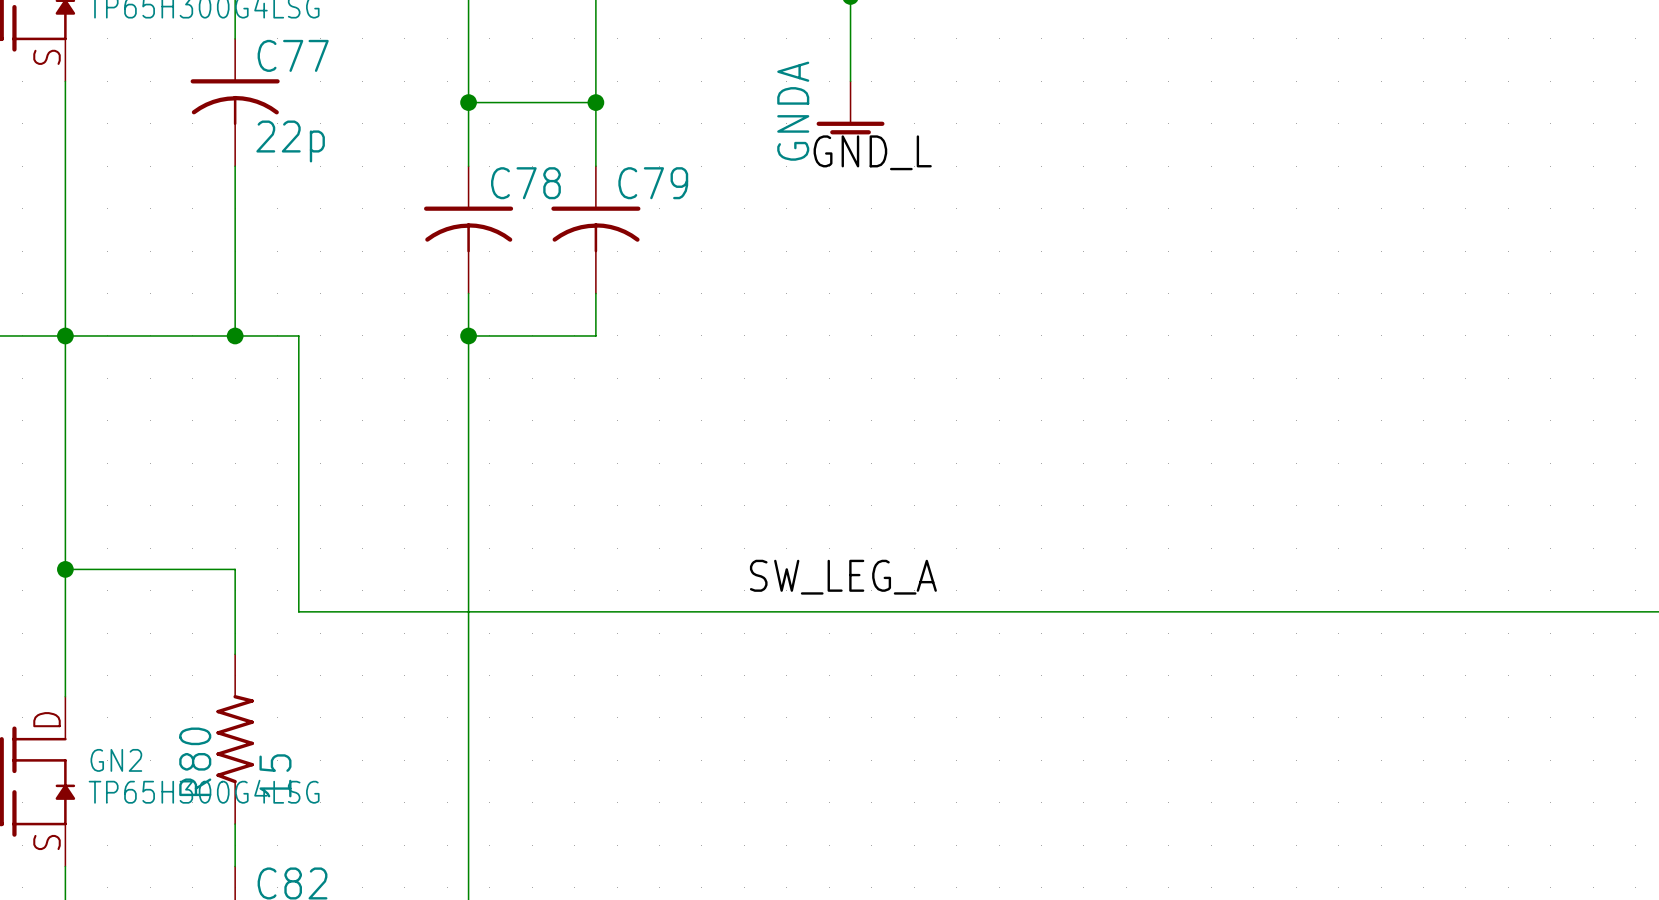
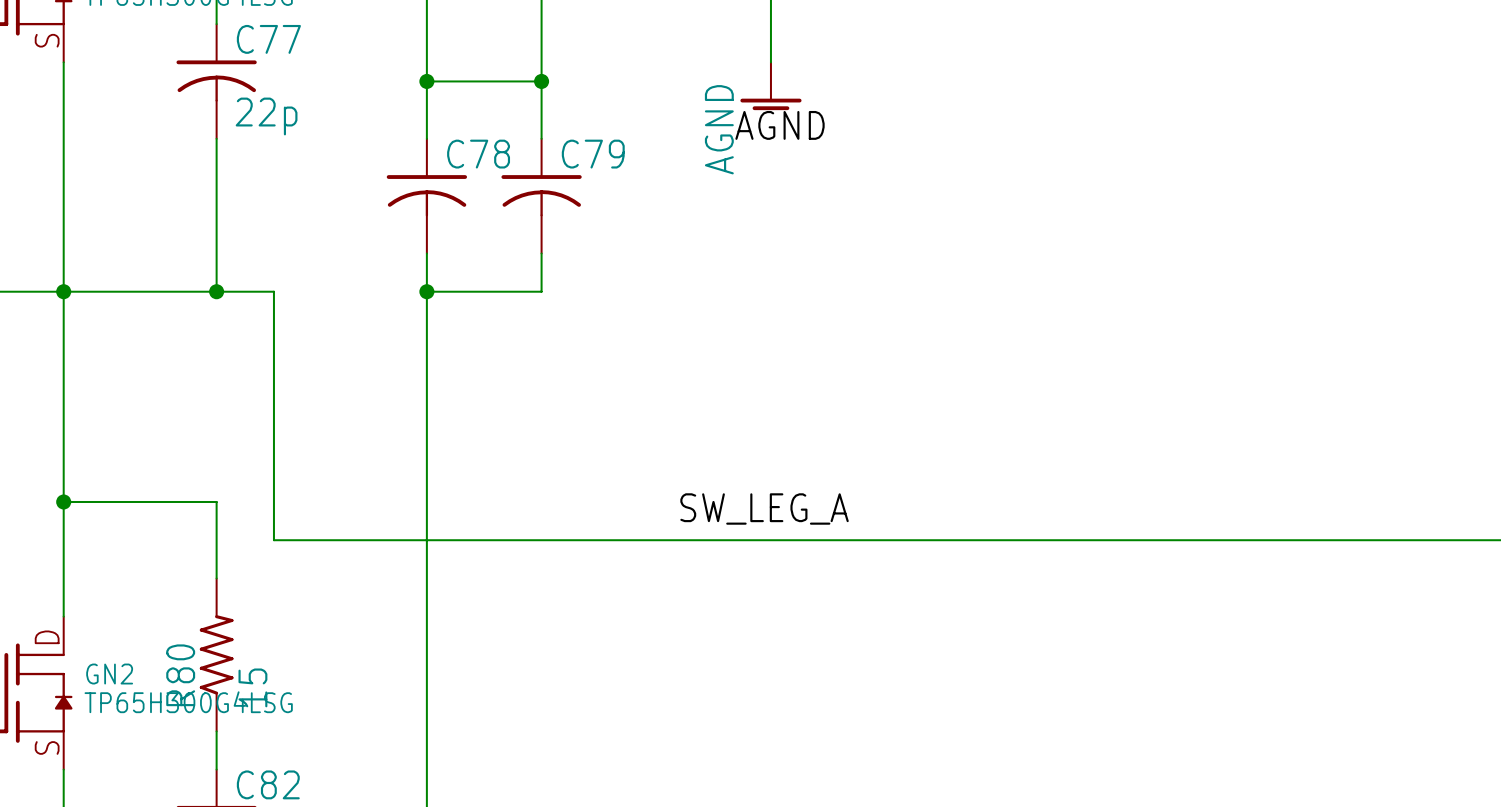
power symbol: GNDA (850, 107) -> AGND (770, 86)
label: GND_L (872, 152) -> AGND (780, 125)

